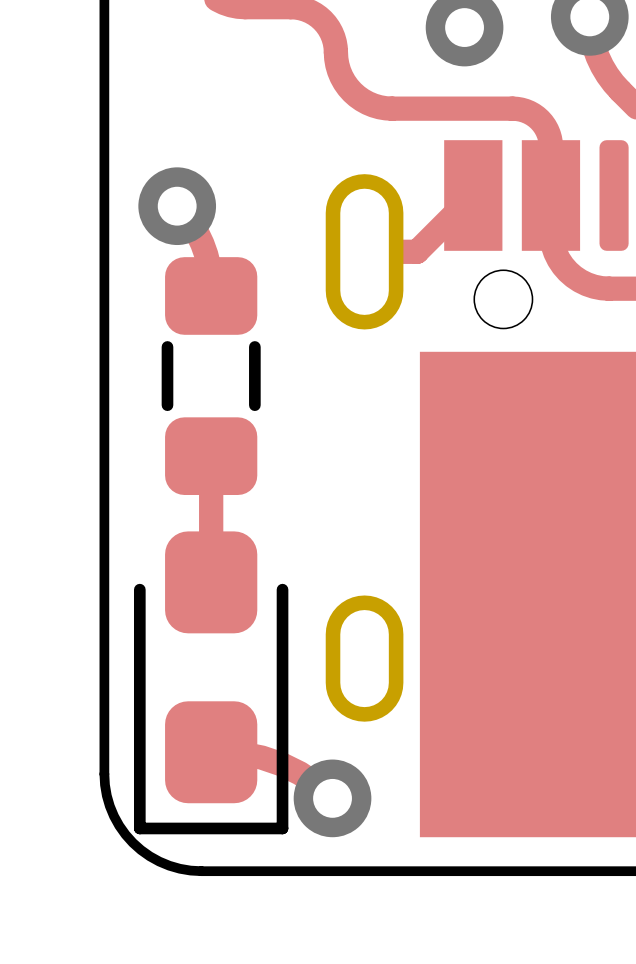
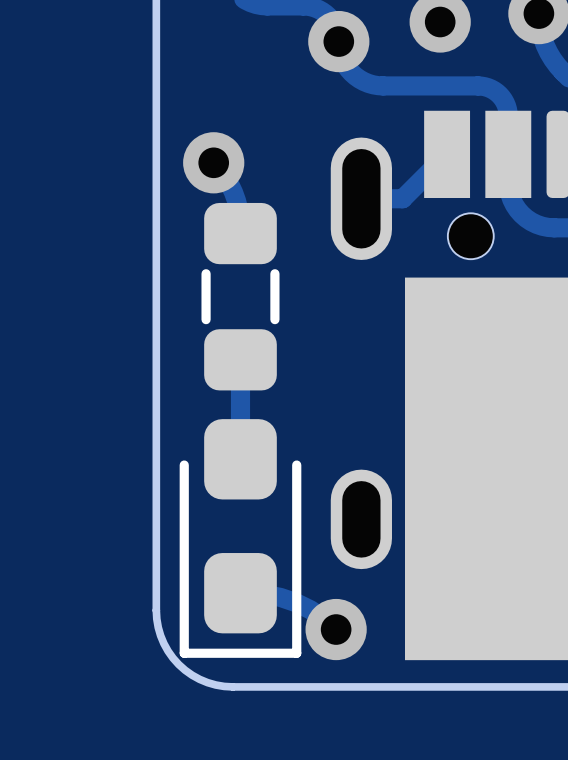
via: none -> (338, 41)

